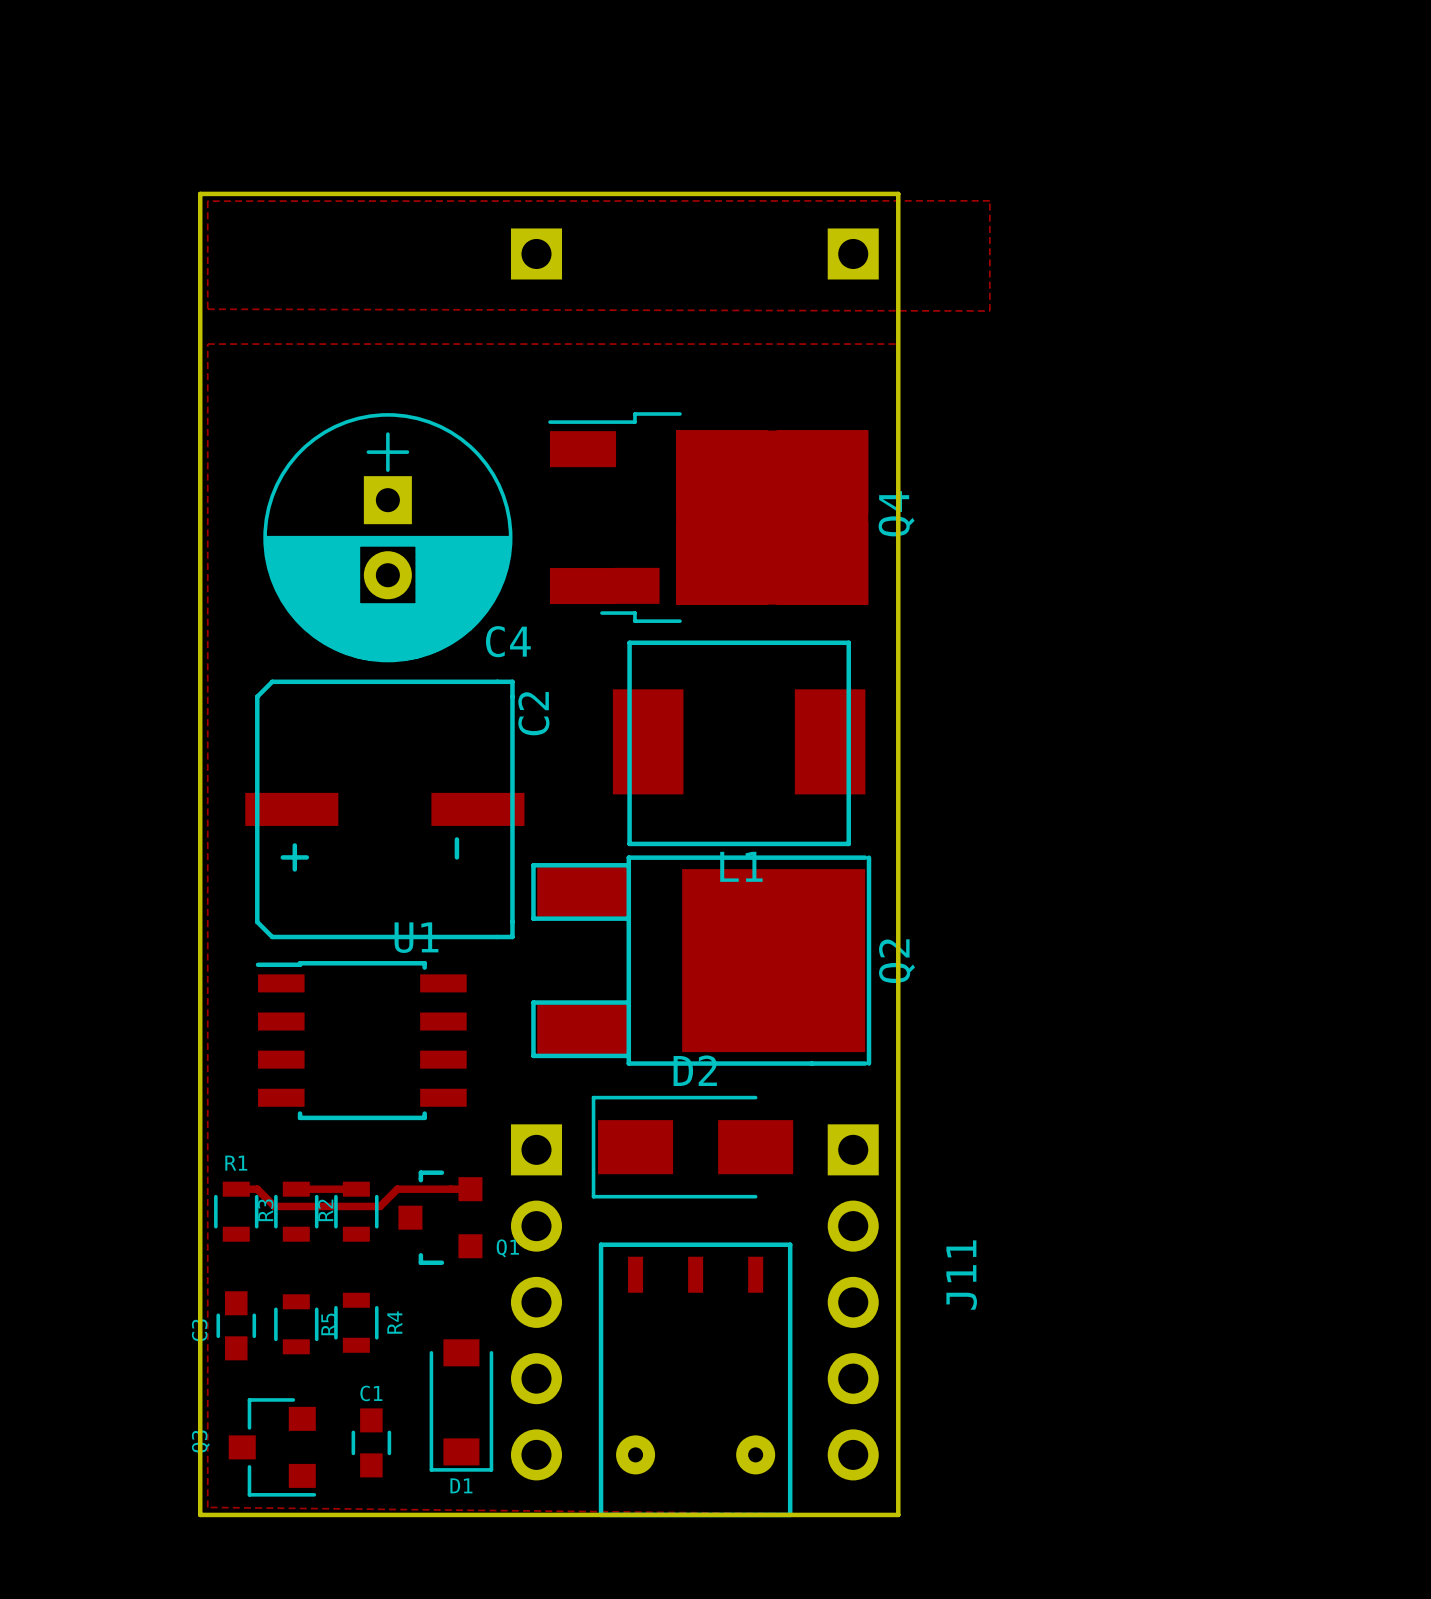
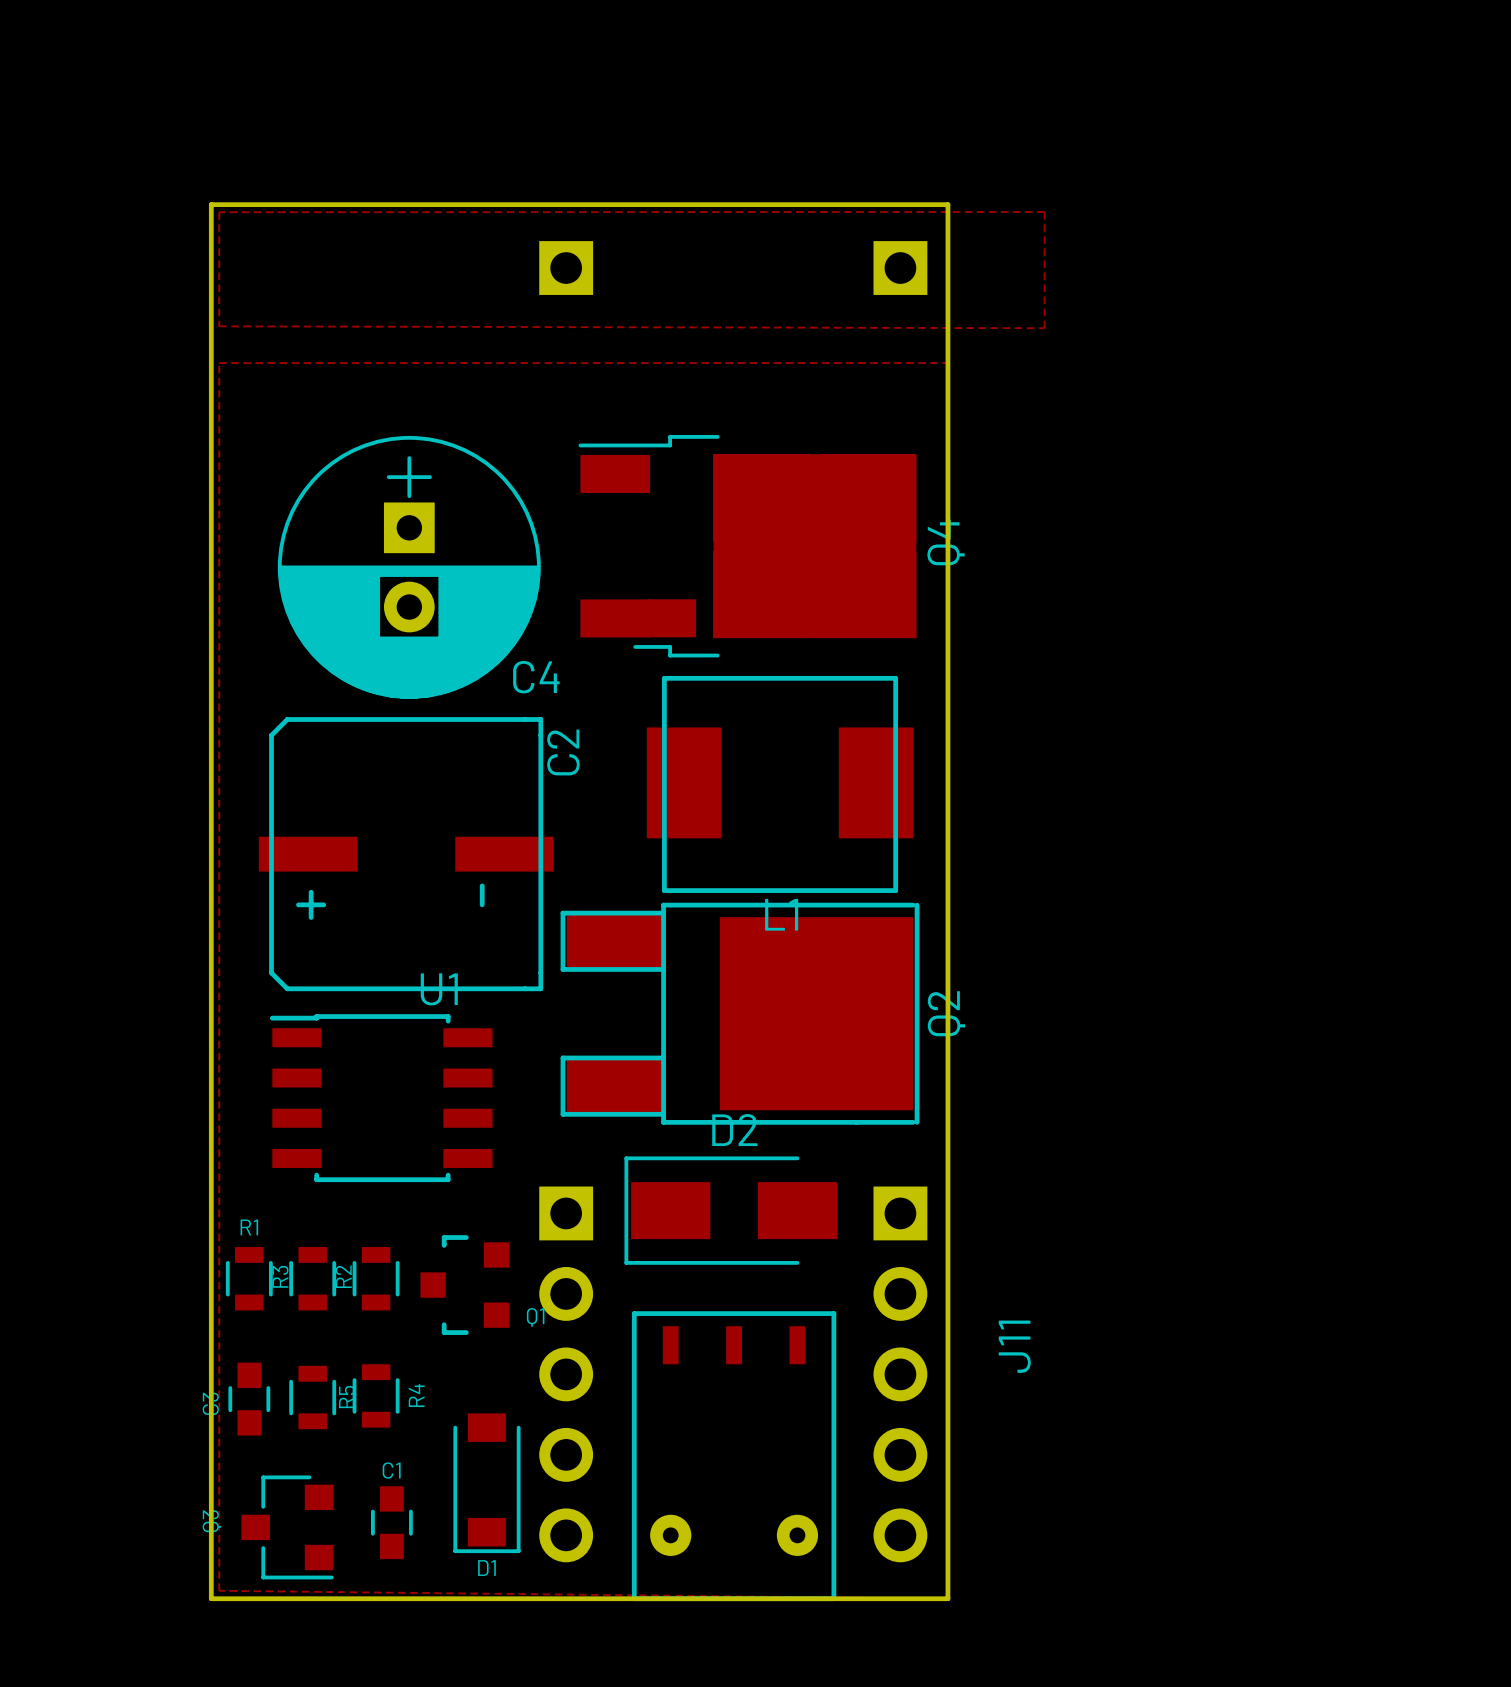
track: (236, 1189) (257, 1189) (274, 1206) (380, 1206) (397, 1189) (470, 1189) -> none
track: (296, 1189) (356, 1189) -> none

